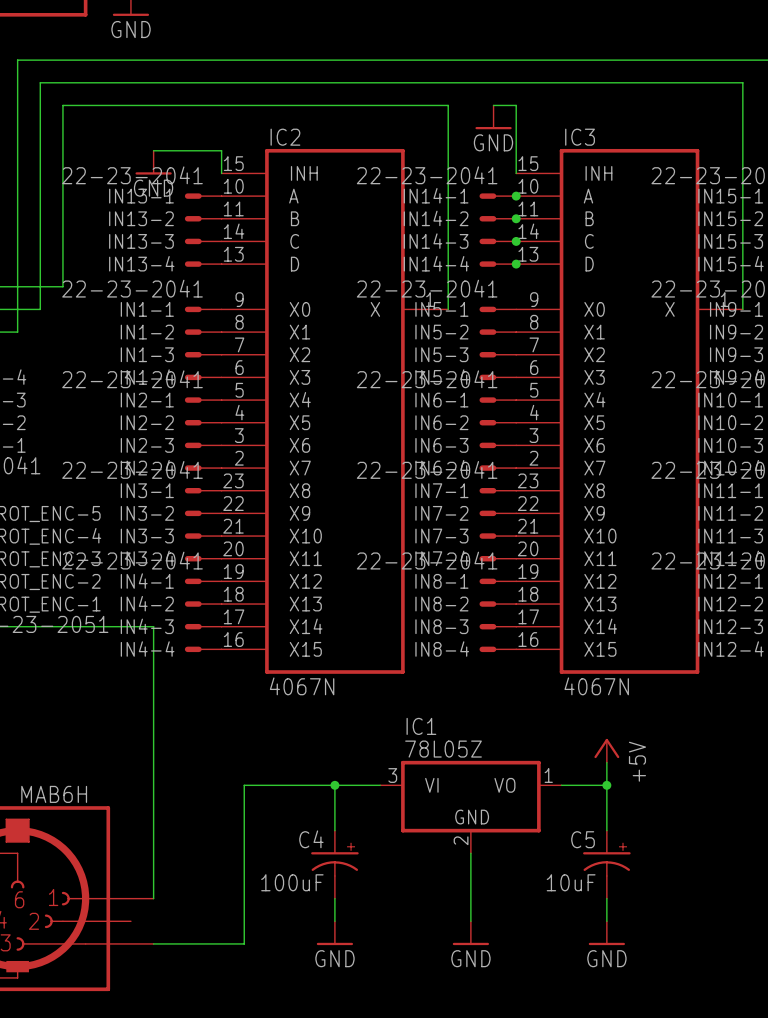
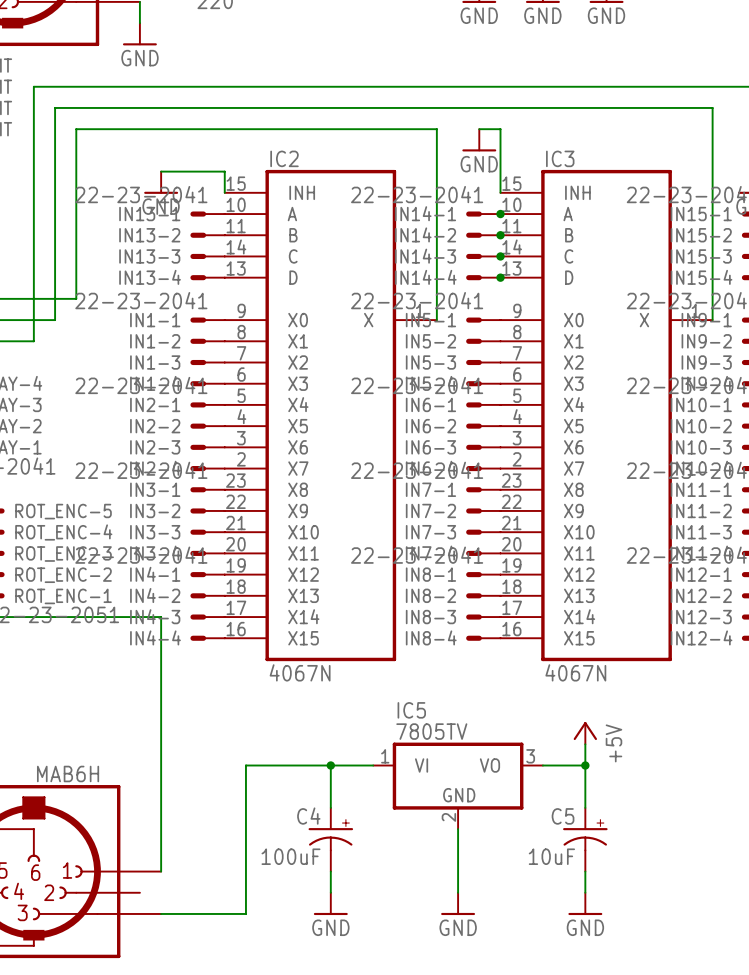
IC1 name: IC1 (421, 726) -> IC5 (411, 710)
IC1 value: 78L05Z (443, 749) -> 7805TV (431, 731)
IC1 pin number: 3 (392, 775) -> 1 (385, 756)
IC1 pin number: 1 (548, 775) -> 3 (530, 756)

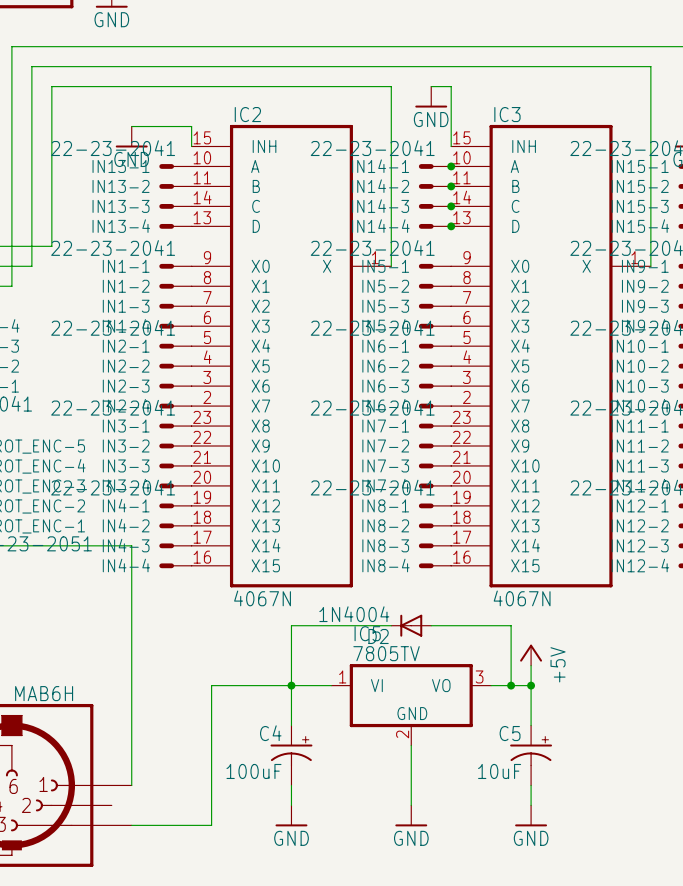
wire: none -> (391, 625) (291, 625) (291, 685)
D2: none -> 1N4004 (411, 625)
wire: none -> (431, 625) (511, 625) (511, 685)
junction: none -> (511, 685)

